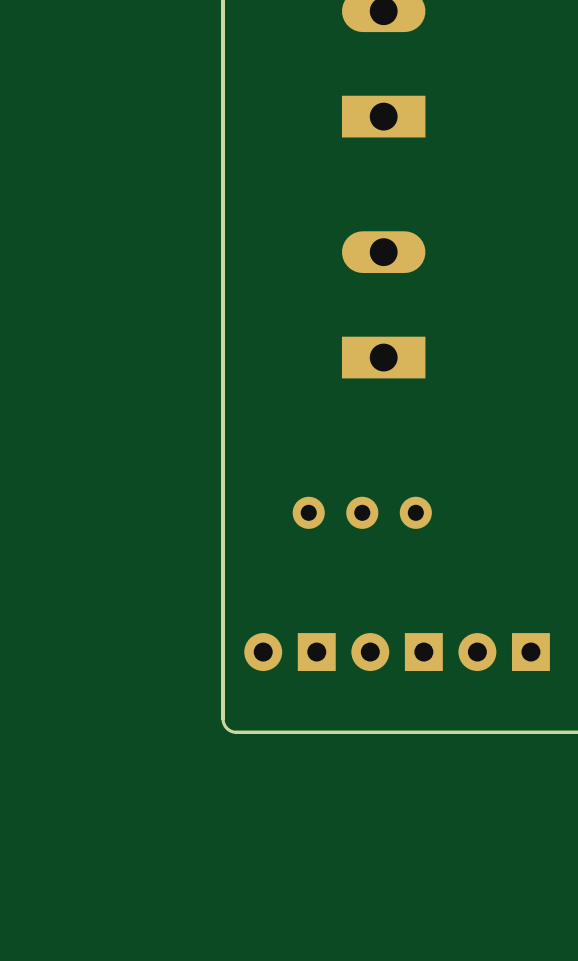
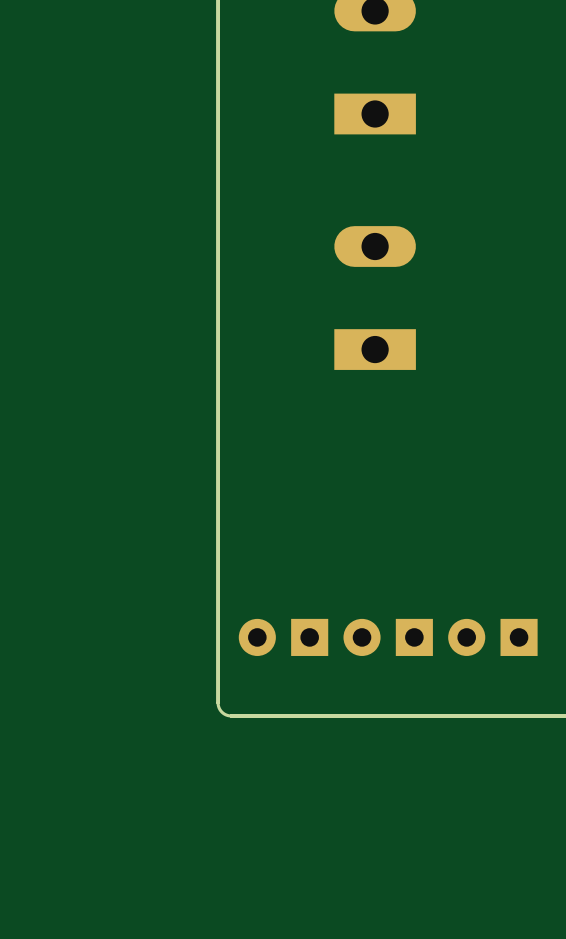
part: (362, 512) -> none

